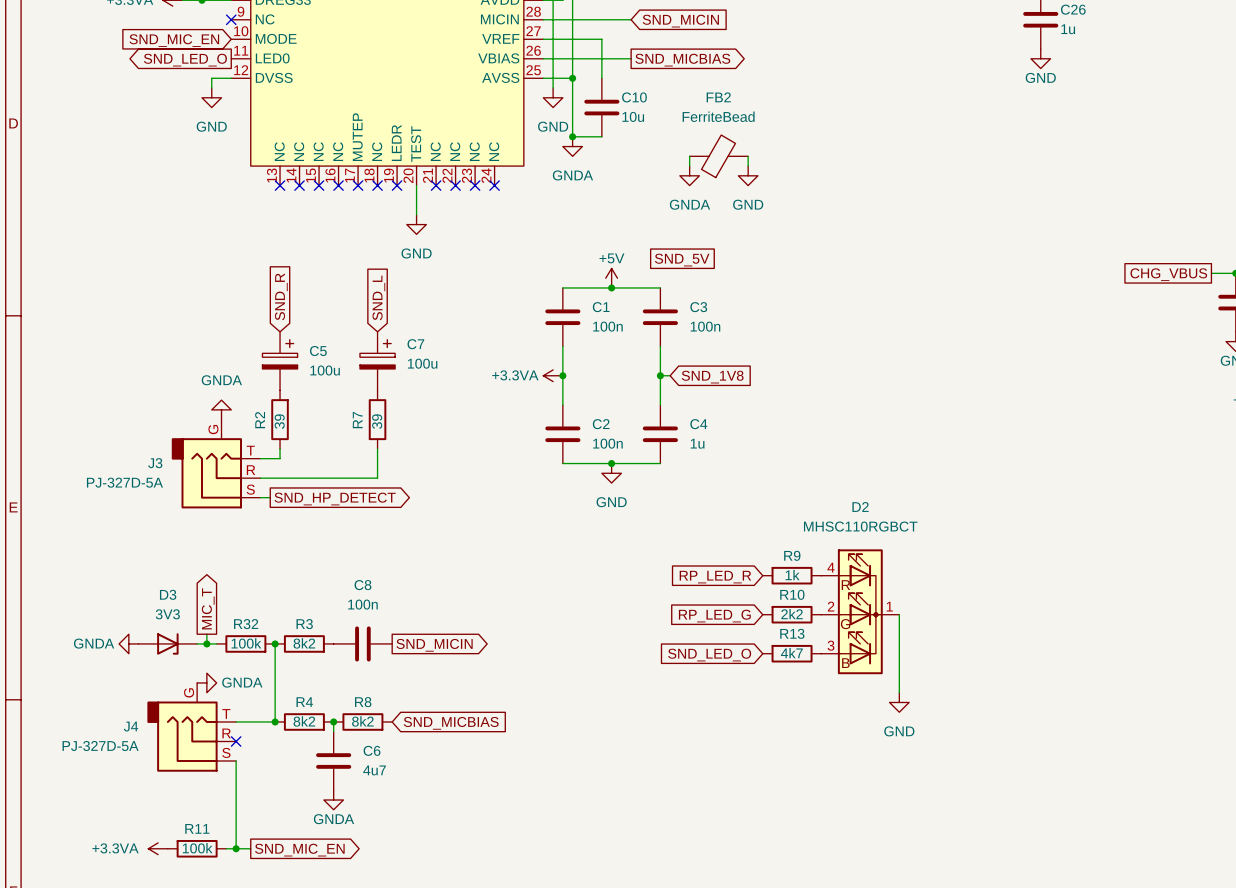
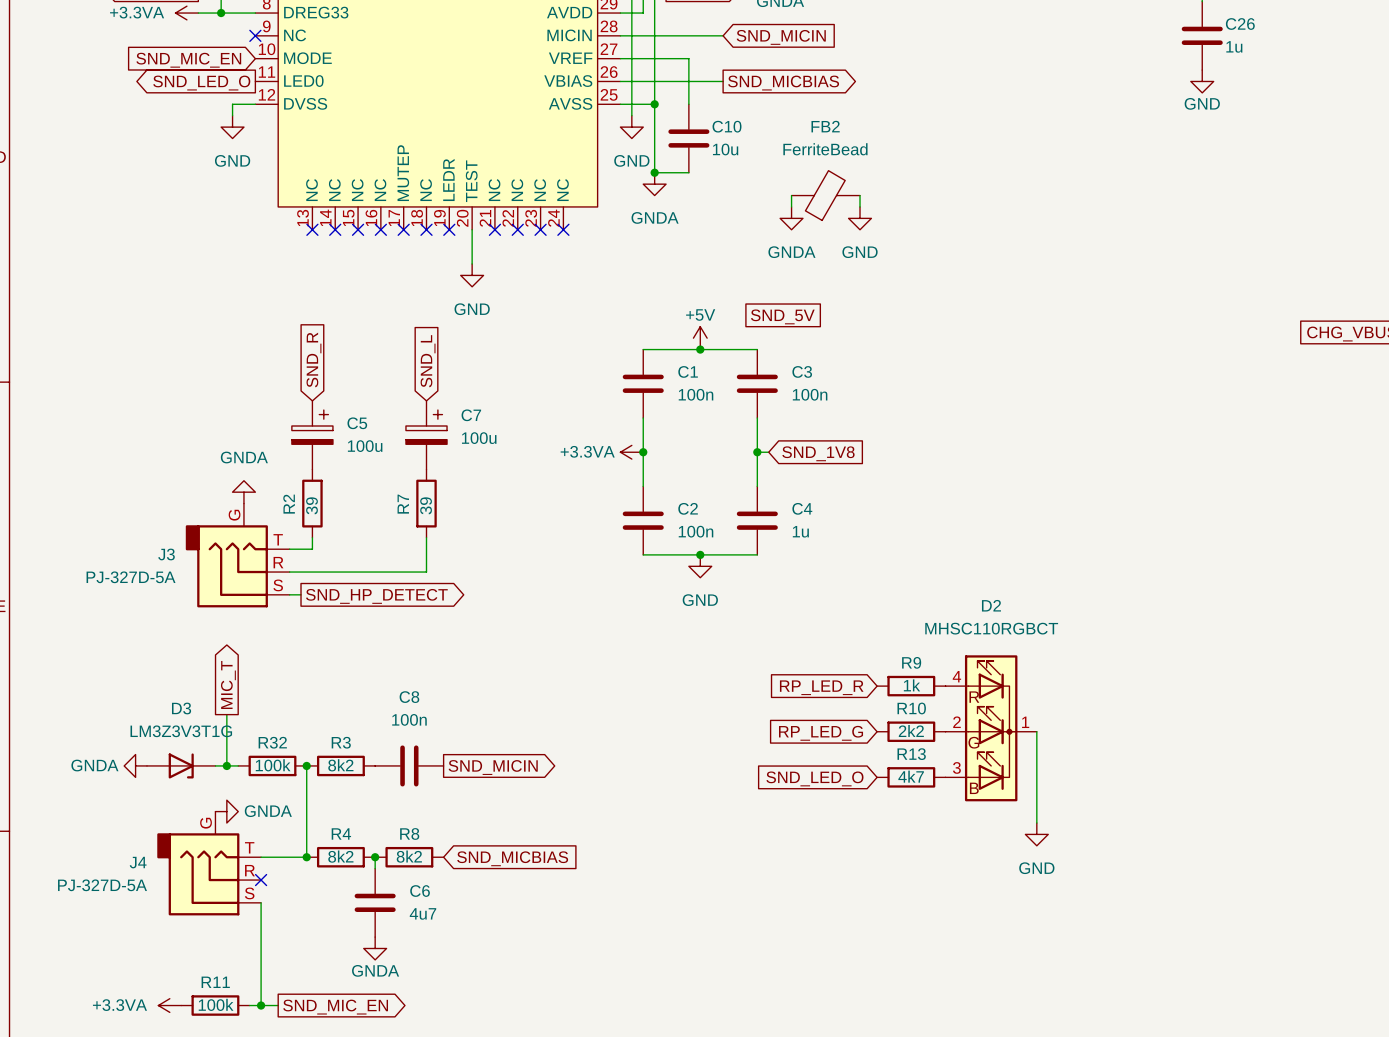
wire: none -> (226, 714) (226, 754)
global label position: MIC_T (208, 608) -> MIC_T (228, 684)
D3 value: 3V3 (167, 614) -> LM3Z3V3T1G (181, 731)

